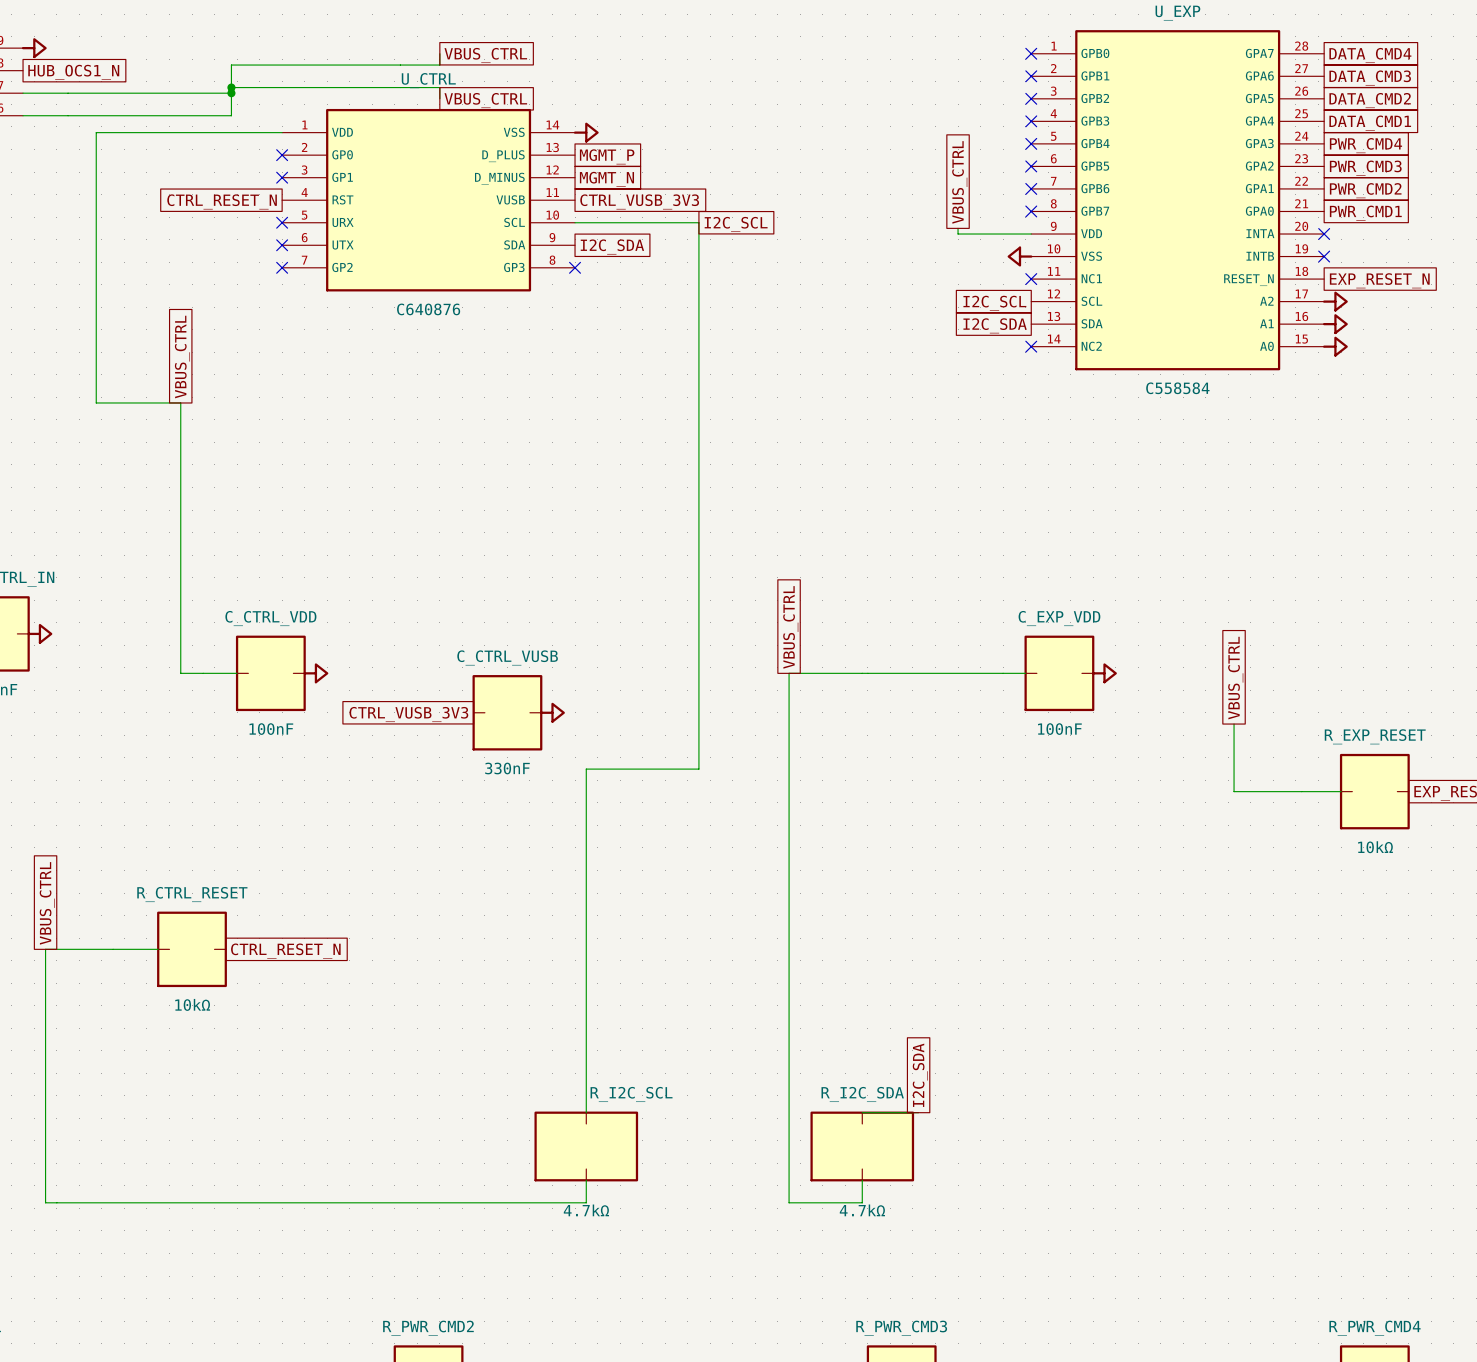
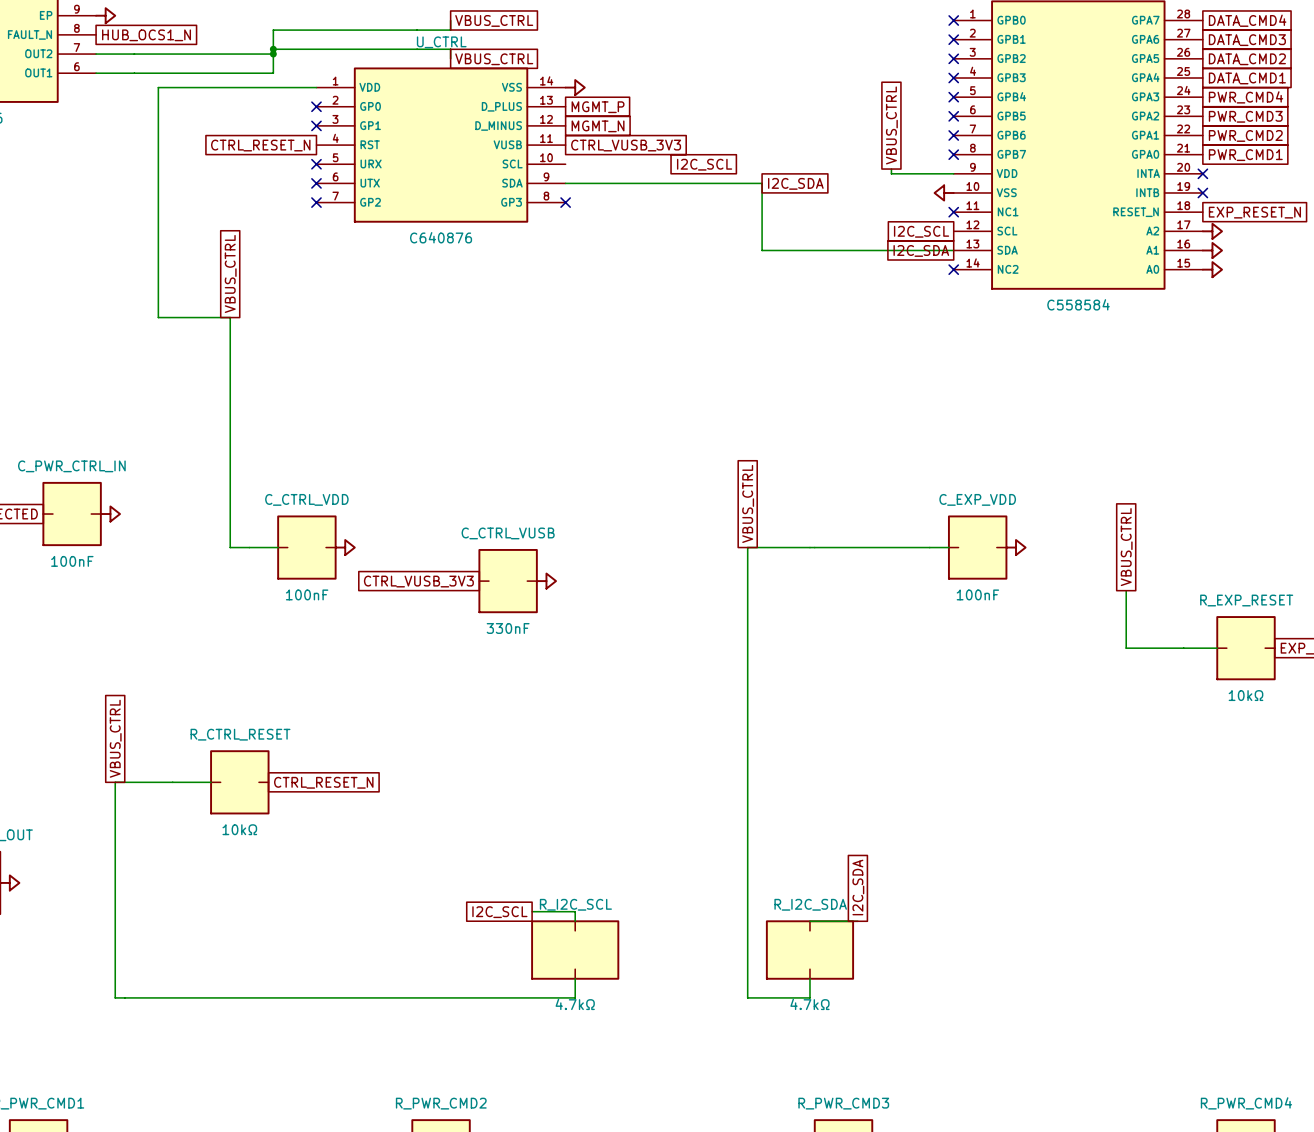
wire: (575, 222) (698, 222) (698, 769) (586, 769) (586, 1101) -> (532, 911) (575, 911)
wire: none -> (565, 183) (762, 183) (762, 250) (953, 250)
global label: I2C_SDA (612, 246) -> none
global label: none -> I2C_SDA (795, 183)
R_I2C_SCL name position: R_I2C_SCL (631, 1094) -> R_I2C_SCL (575, 904)
global label: none -> I2C_SCL (499, 912)

